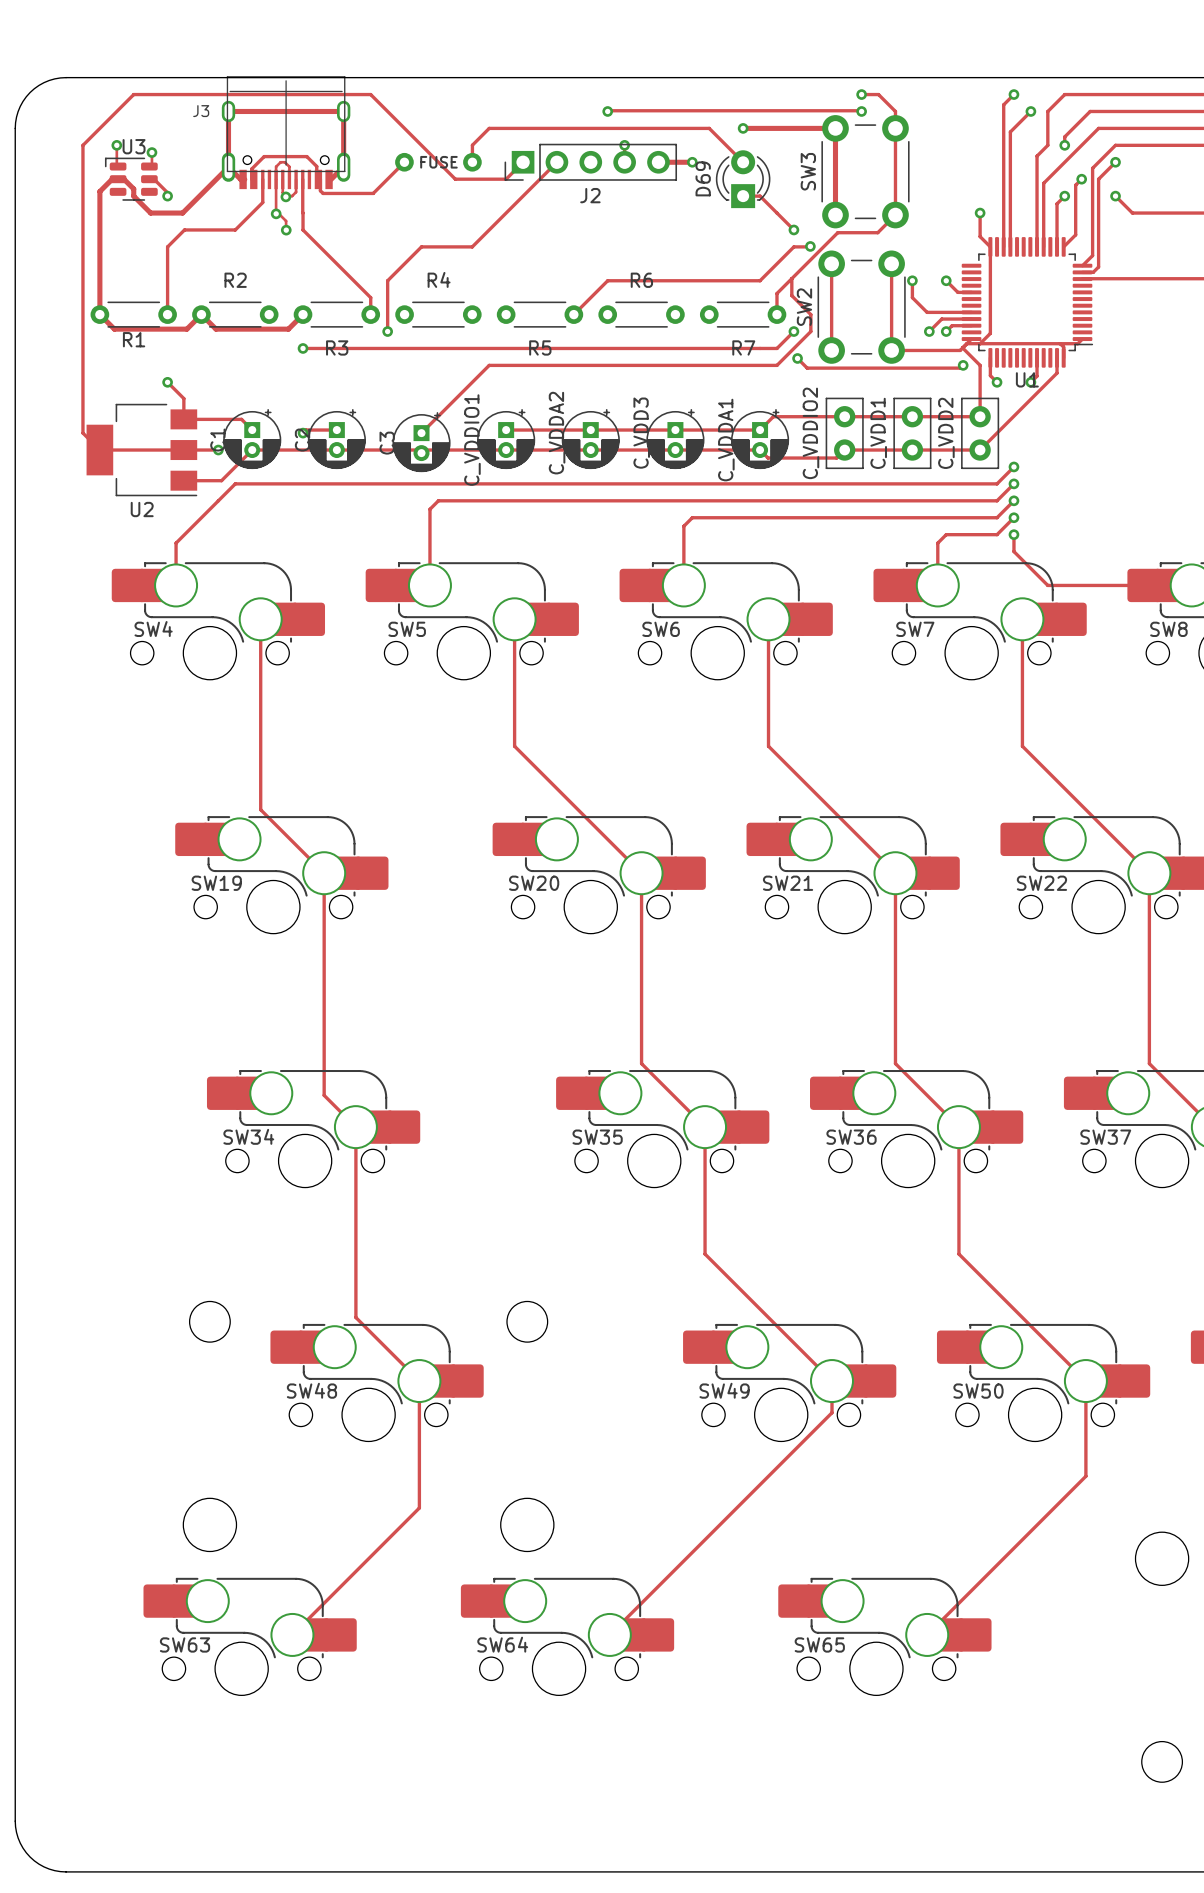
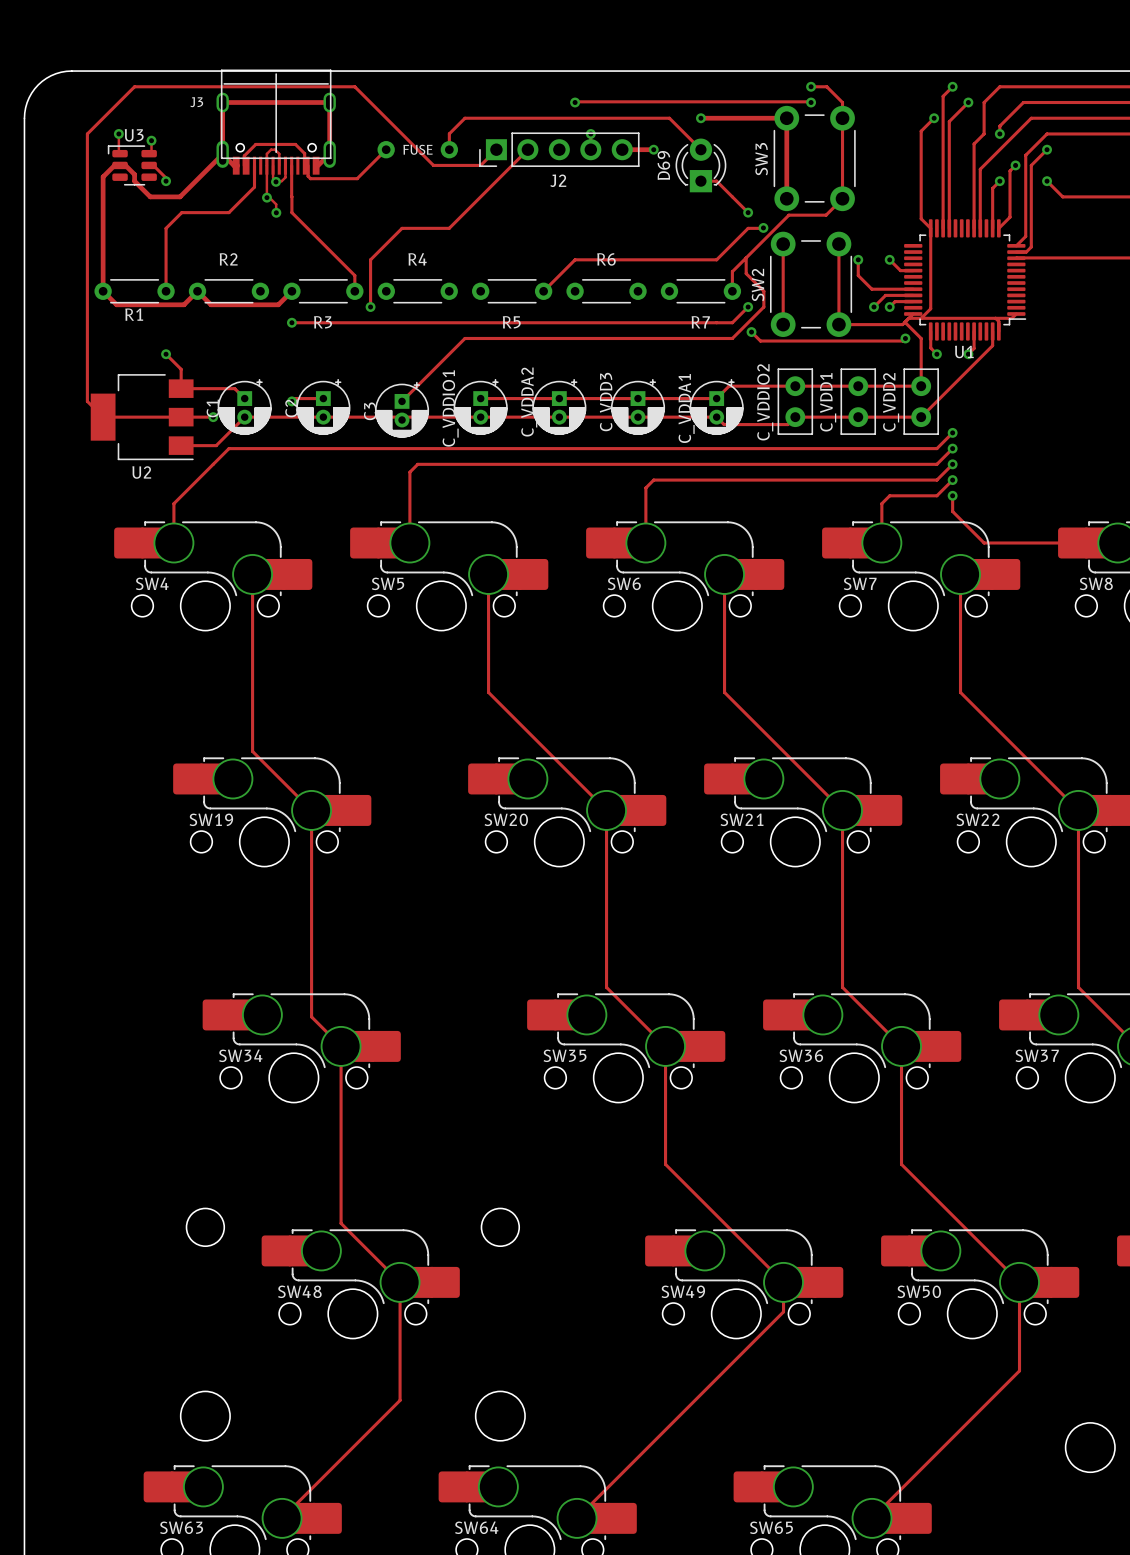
track: none -> (934, 118) (921, 131) (921, 196)
via: none -> (934, 118)
via: (980, 213) -> none

